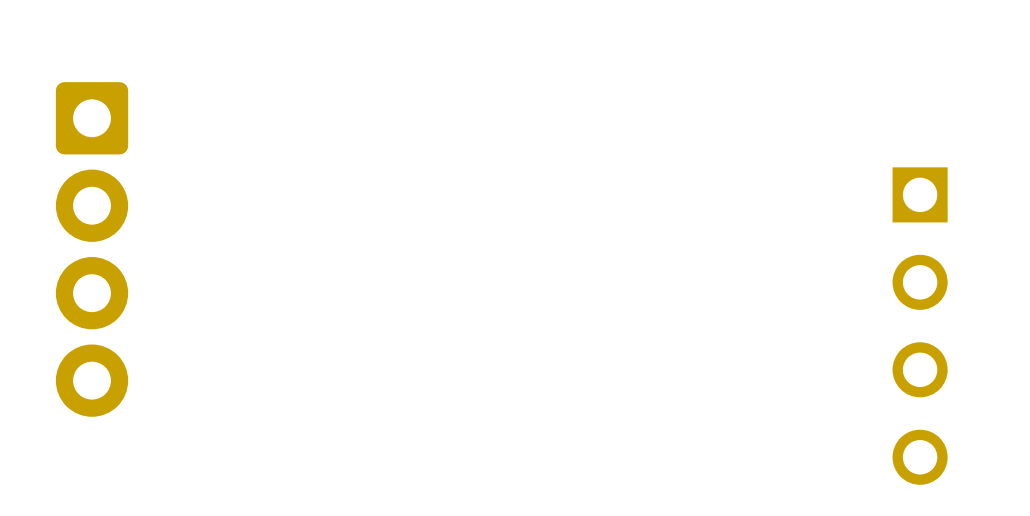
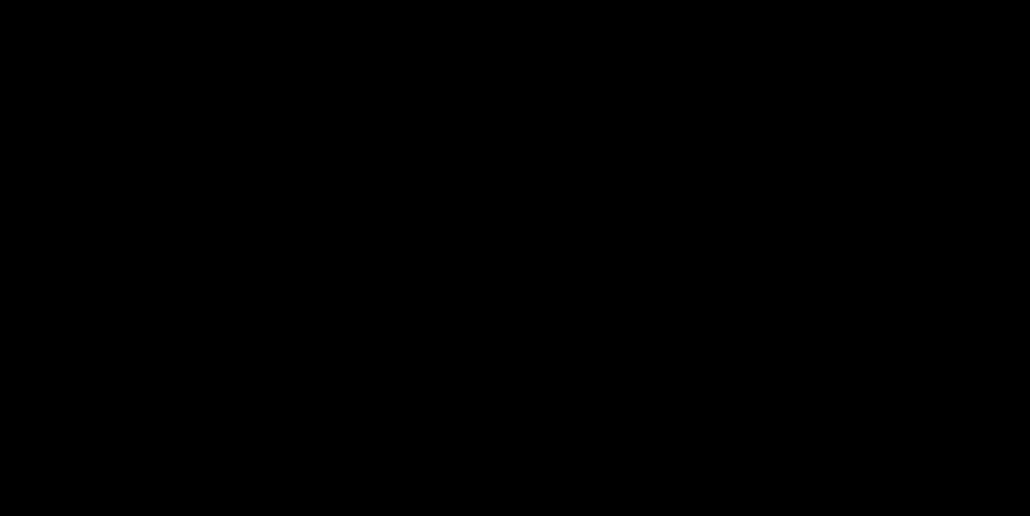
part: (92, 249) -> none
part: (920, 326) -> none

